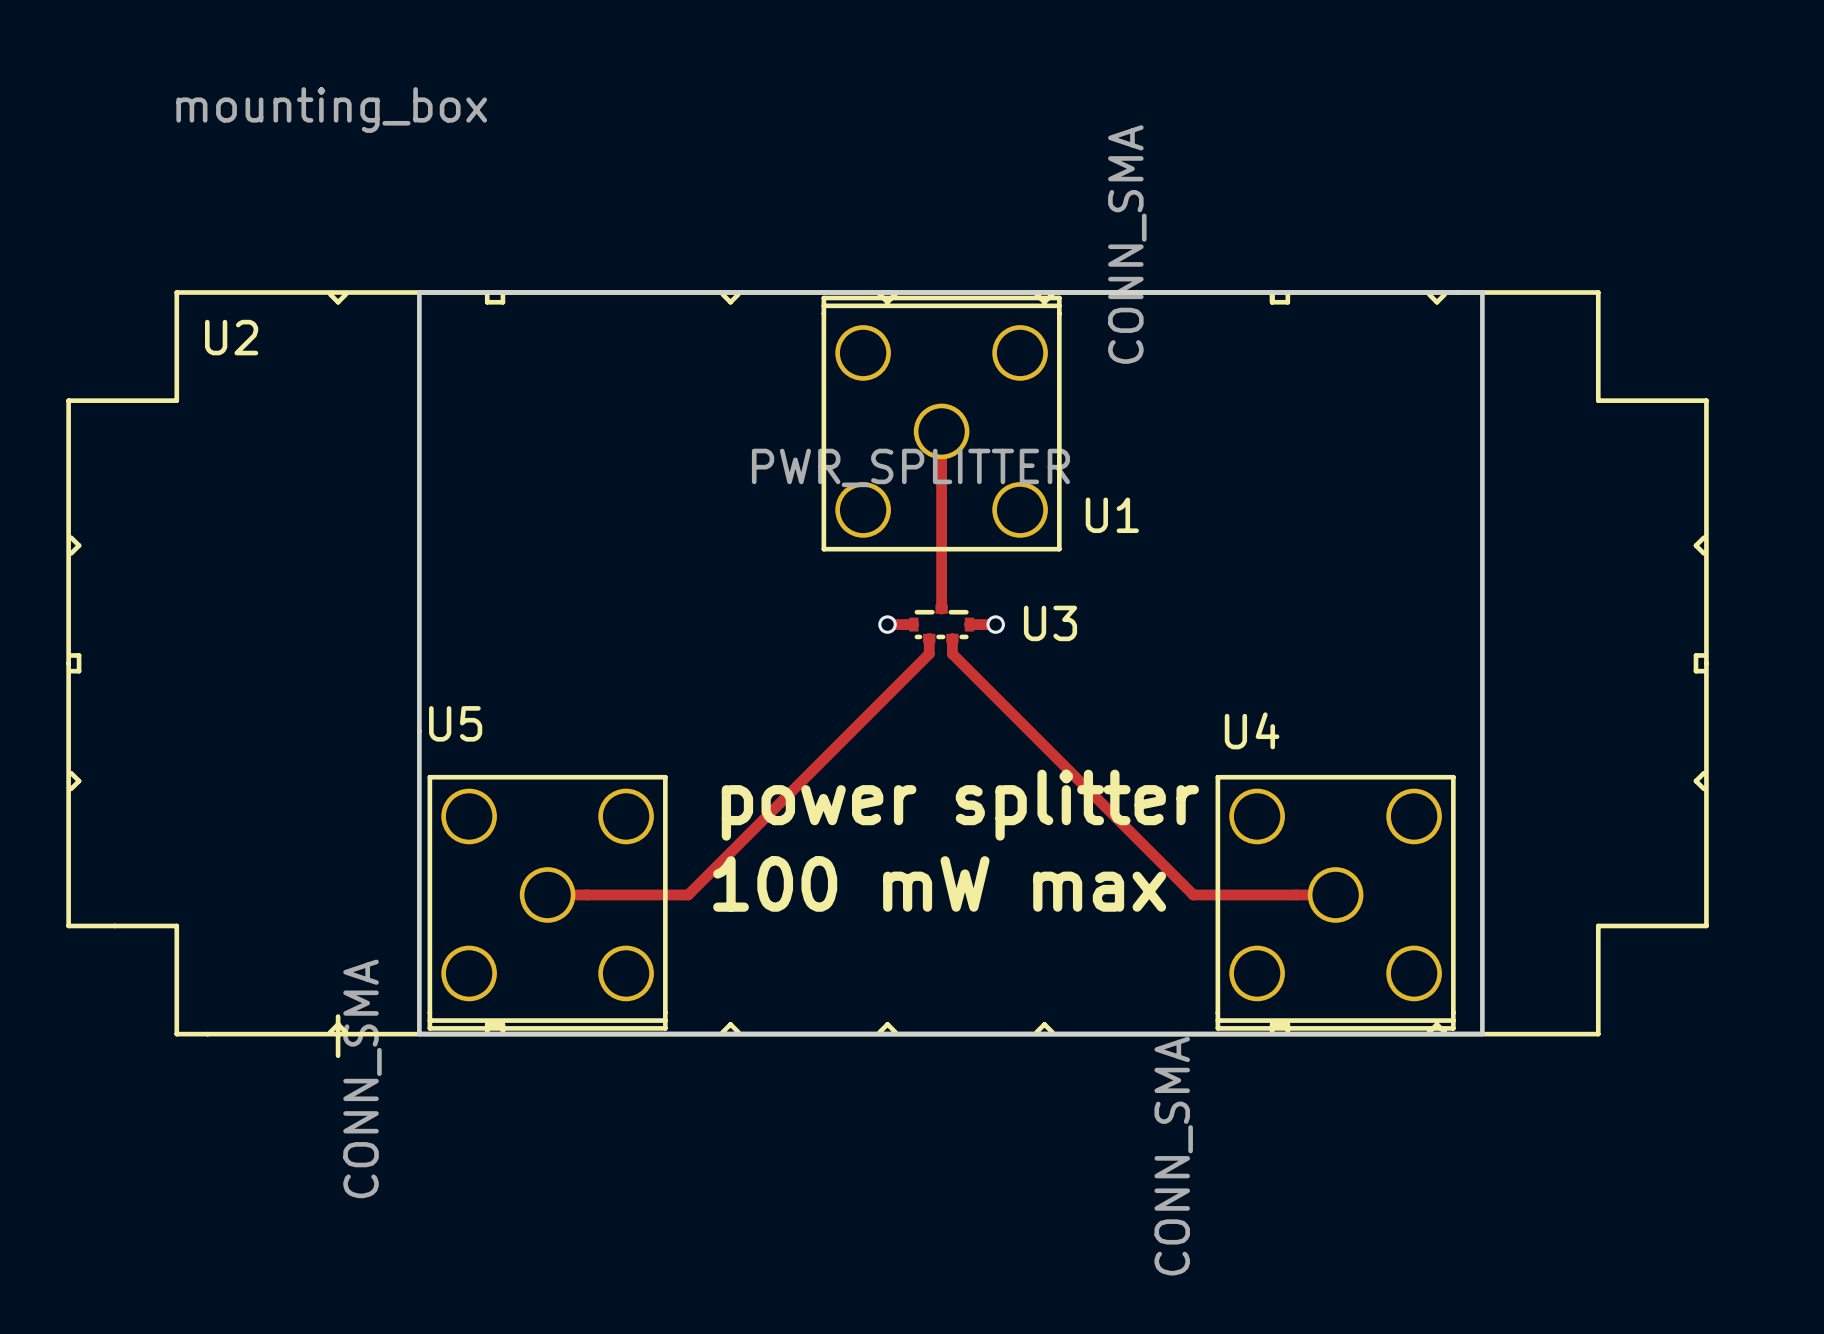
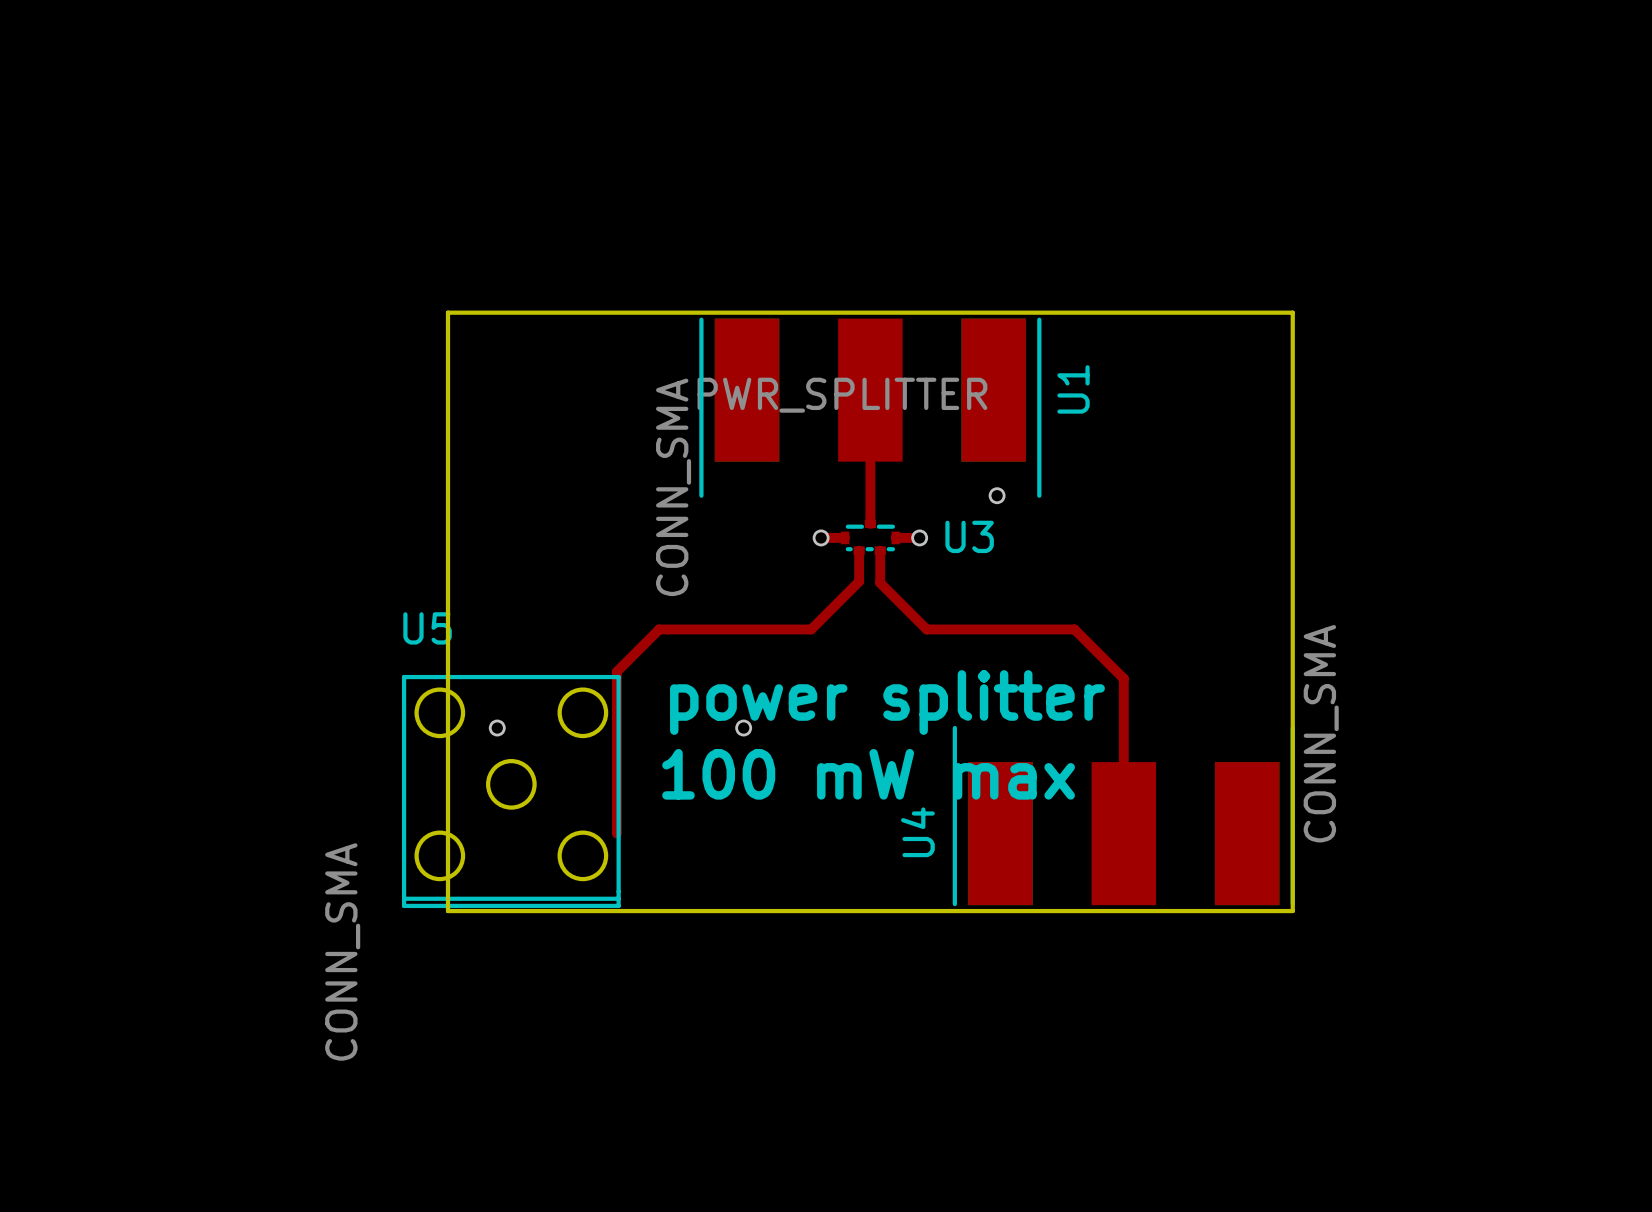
U1 value position: CONN_SMA (1127, 244) -> CONN_SMA (673, 487)
U1 footprint: [821, 295, 1062, 552] -> [699, 317, 1042, 498]
U1 name position: U1 (1112, 515) -> U1 (1073, 389)
via: none -> (997, 495)
top track: (929, 653) (688, 894) (547, 894) -> (859, 564) (859, 581) (811, 629) (659, 629) (616, 671) (616, 833)
top track: (952, 653) (1193, 894) (1335, 894) -> (880, 564) (880, 583) (926, 629) (1074, 629) (1123, 678) (1123, 833)
U2: mounting_box (887, 674) -> none
U4 name position: U4 (1252, 730) -> U4 (917, 832)
U4 footprint: [1215, 774, 1456, 1031] -> [952, 725, 1295, 907]
via: none -> (497, 728)
via: none -> (743, 728)
board edge: (478, 1034) (419, 1034) (419, 292) (1482, 292) (1482, 1034) (1405, 1034) -> (447, 911) (447, 312) (1292, 312) (1292, 911)
U4 value position: CONN_SMA (1173, 1156) -> CONN_SMA (1321, 733)

